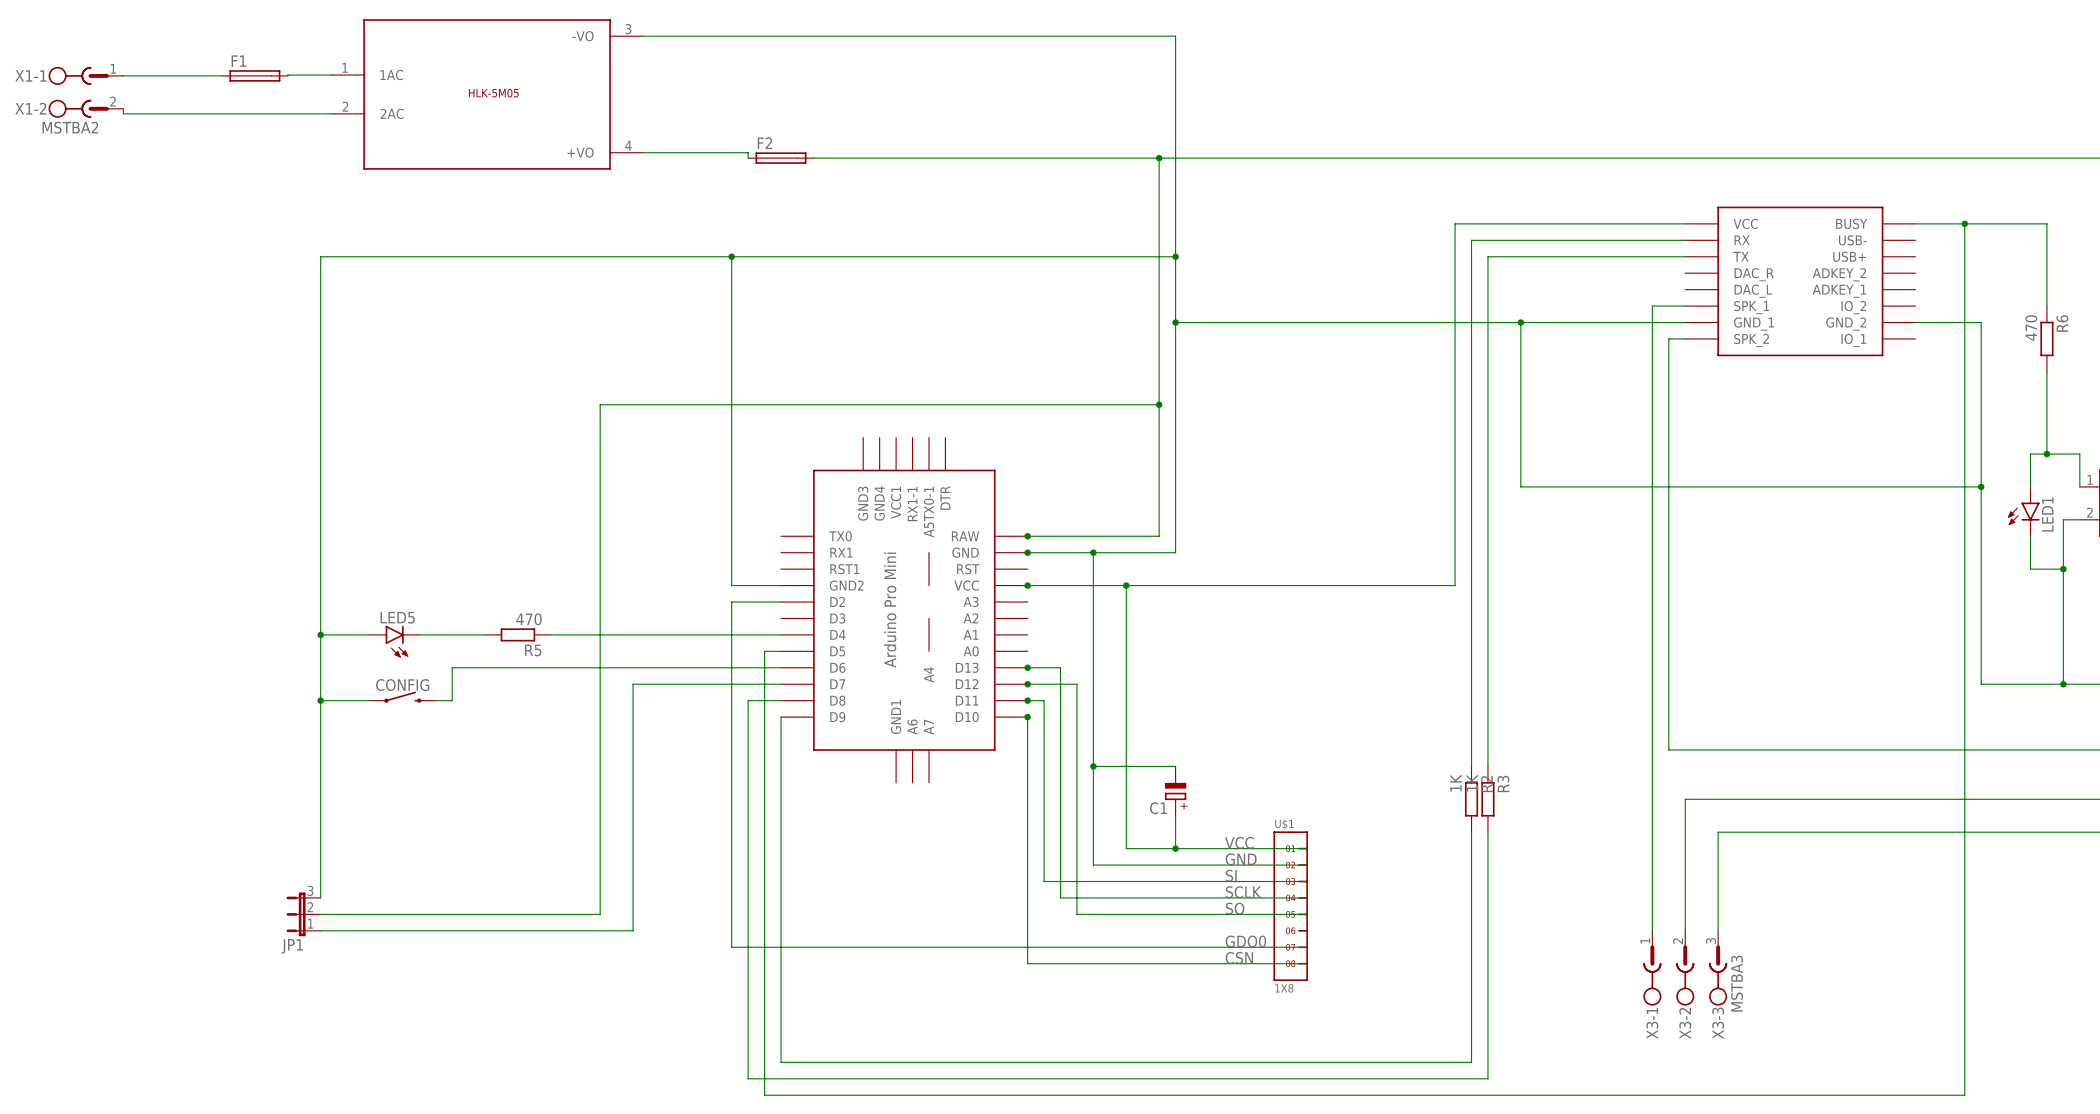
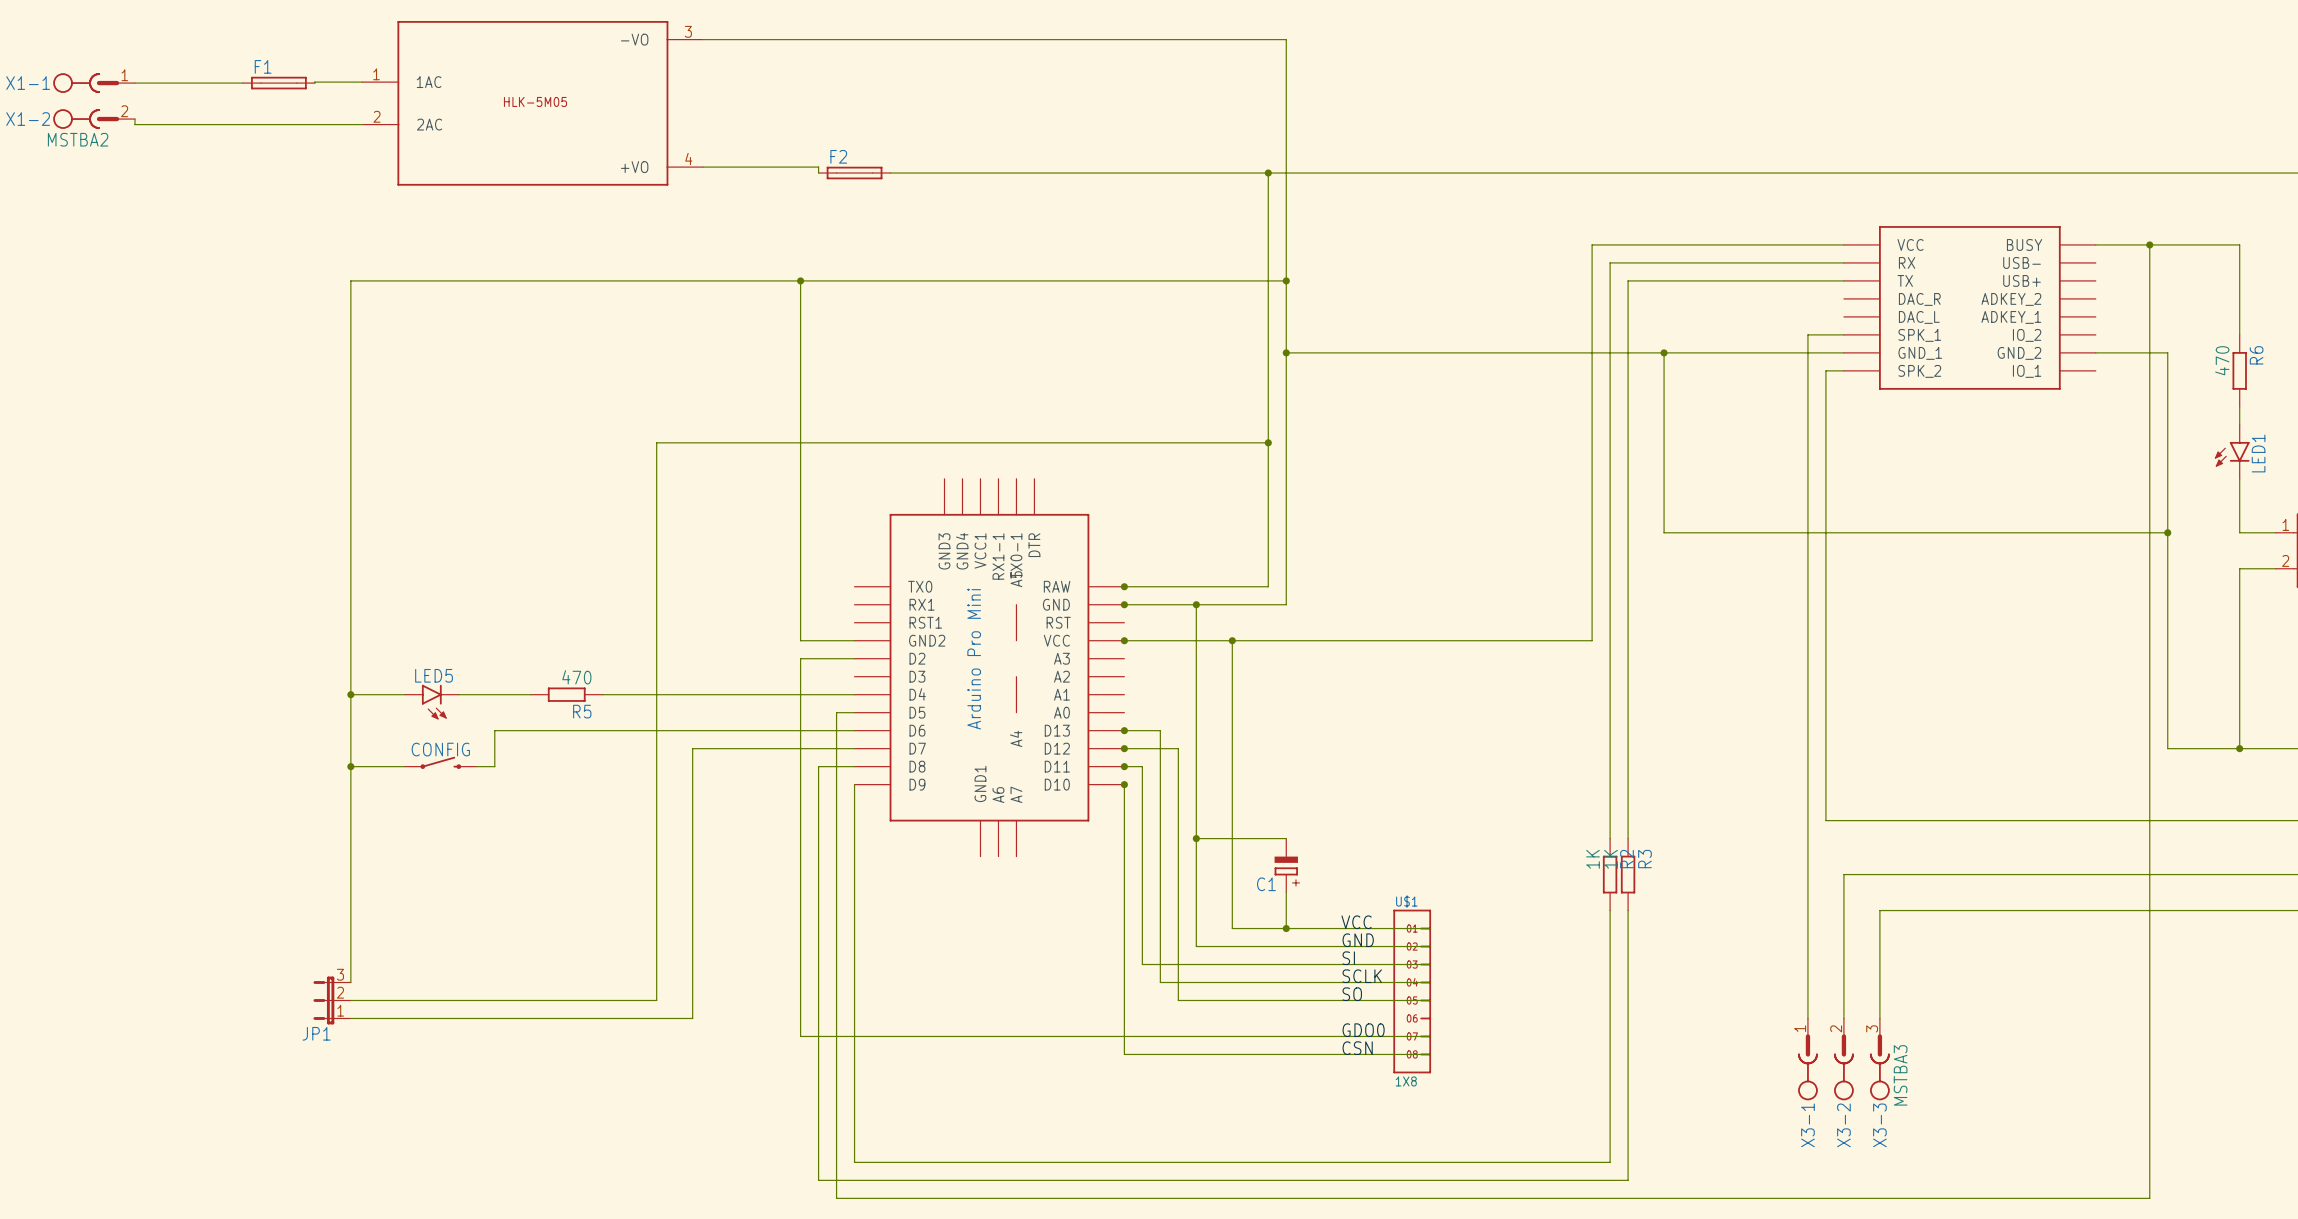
junction: (2046, 454) -> none
wire: (2030, 486) (2030, 454) (2079, 454) (2079, 486) -> (2239, 496) (2239, 532) (2275, 532)
LED1 position: (2023, 511) -> (2232, 451)
wire: (2063, 519) (2063, 684) -> (2257, 568) (2239, 568) (2239, 748)
wire: (2030, 536) (2030, 569) (2063, 569) -> none
junction: (2063, 569) -> none
junction position: (2063, 684) -> (2239, 748)

